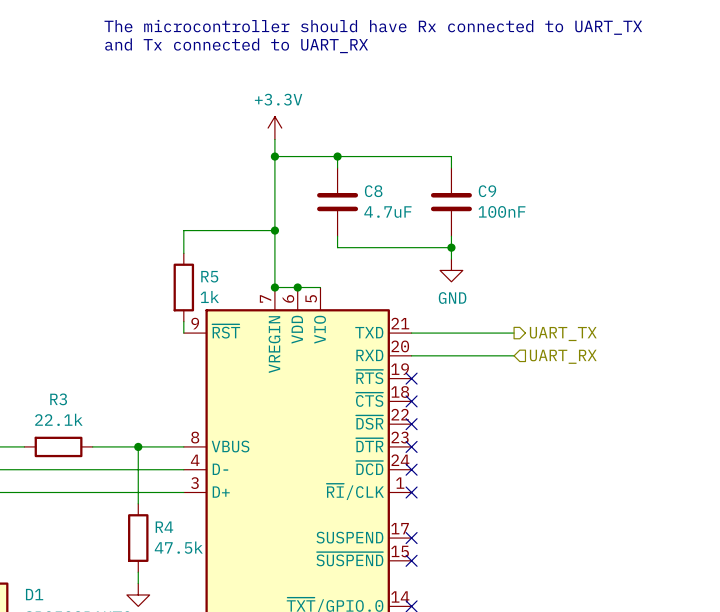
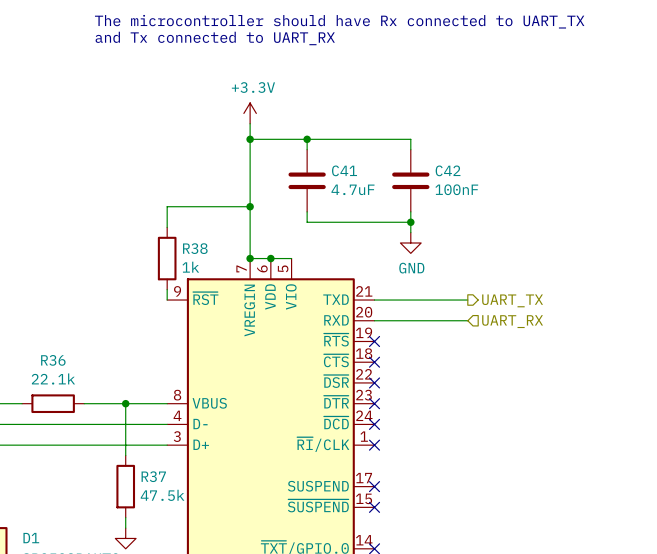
C8 name: C8 (373, 191) -> C41 (344, 170)
C9 name: C9 (487, 191) -> C42 (448, 170)
R5 name: R5 (209, 276) -> R38 (195, 248)
R3 name: R3 (58, 399) -> R36 (53, 360)
R4 name: R4 (164, 527) -> R37 (153, 476)

